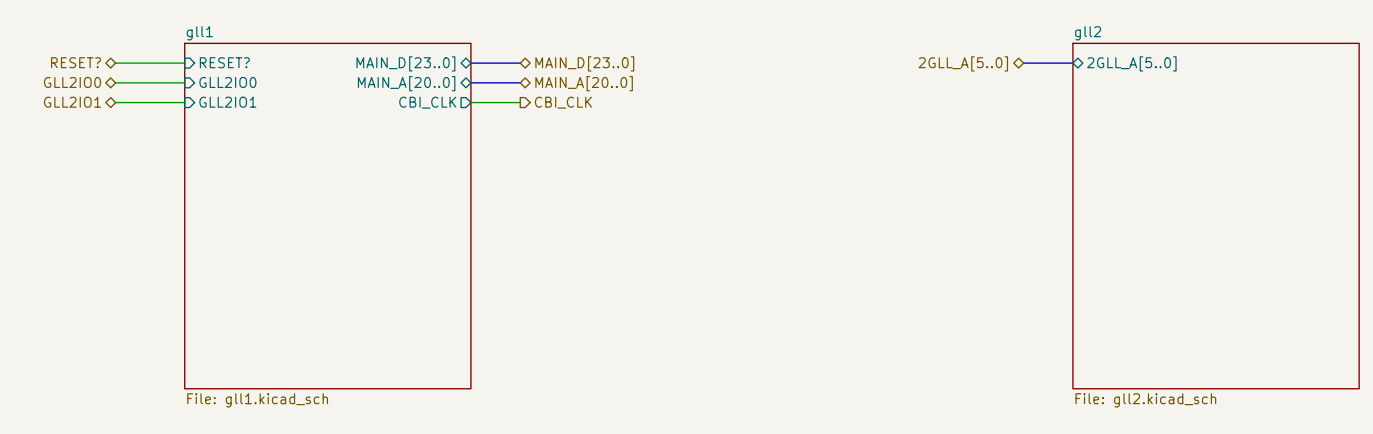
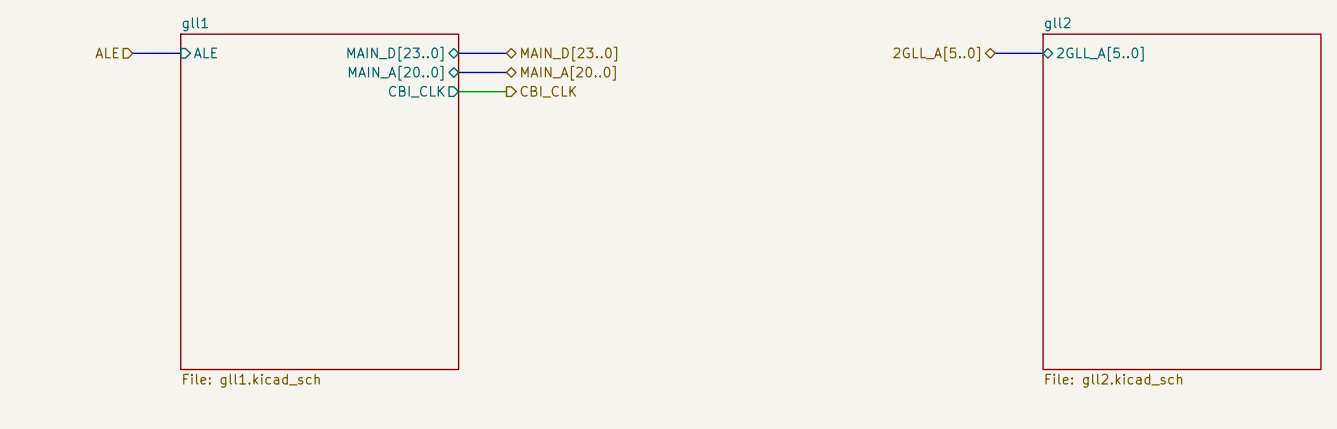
hierarchical label: RESET? (76, 62) -> none
hierarchical label: none -> ALE (107, 52)
sheet pin: RESET? (224, 62) -> ALE (205, 52)
bus: none -> (132, 53) (180, 53)
hierarchical label: GLL2IO0 (72, 82) -> none
wire: (115, 82) (184, 82) -> none
sheet pin: GLL2IO0 (227, 82) -> none
hierarchical label: GLL2IO1 (72, 102) -> none
wire: (115, 102) (184, 102) -> none
sheet pin: GLL2IO1 (227, 102) -> none

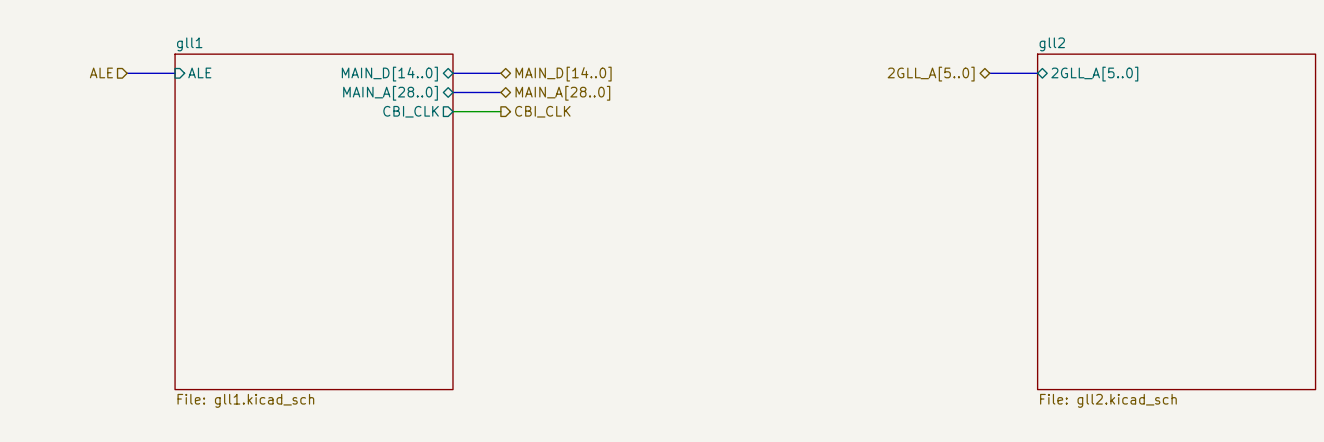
sheet pin: MAIN_D[23..0] (395, 54) -> MAIN_D[14..0] (389, 74)
hierarchical label: MAIN_D[23..0] (569, 54) -> MAIN_D[14..0] (563, 74)
sheet pin: MAIN_A[20..0] (396, 73) -> MAIN_A[28..0] (390, 93)
hierarchical label: MAIN_A[20..0] (568, 73) -> MAIN_A[28..0] (562, 93)

